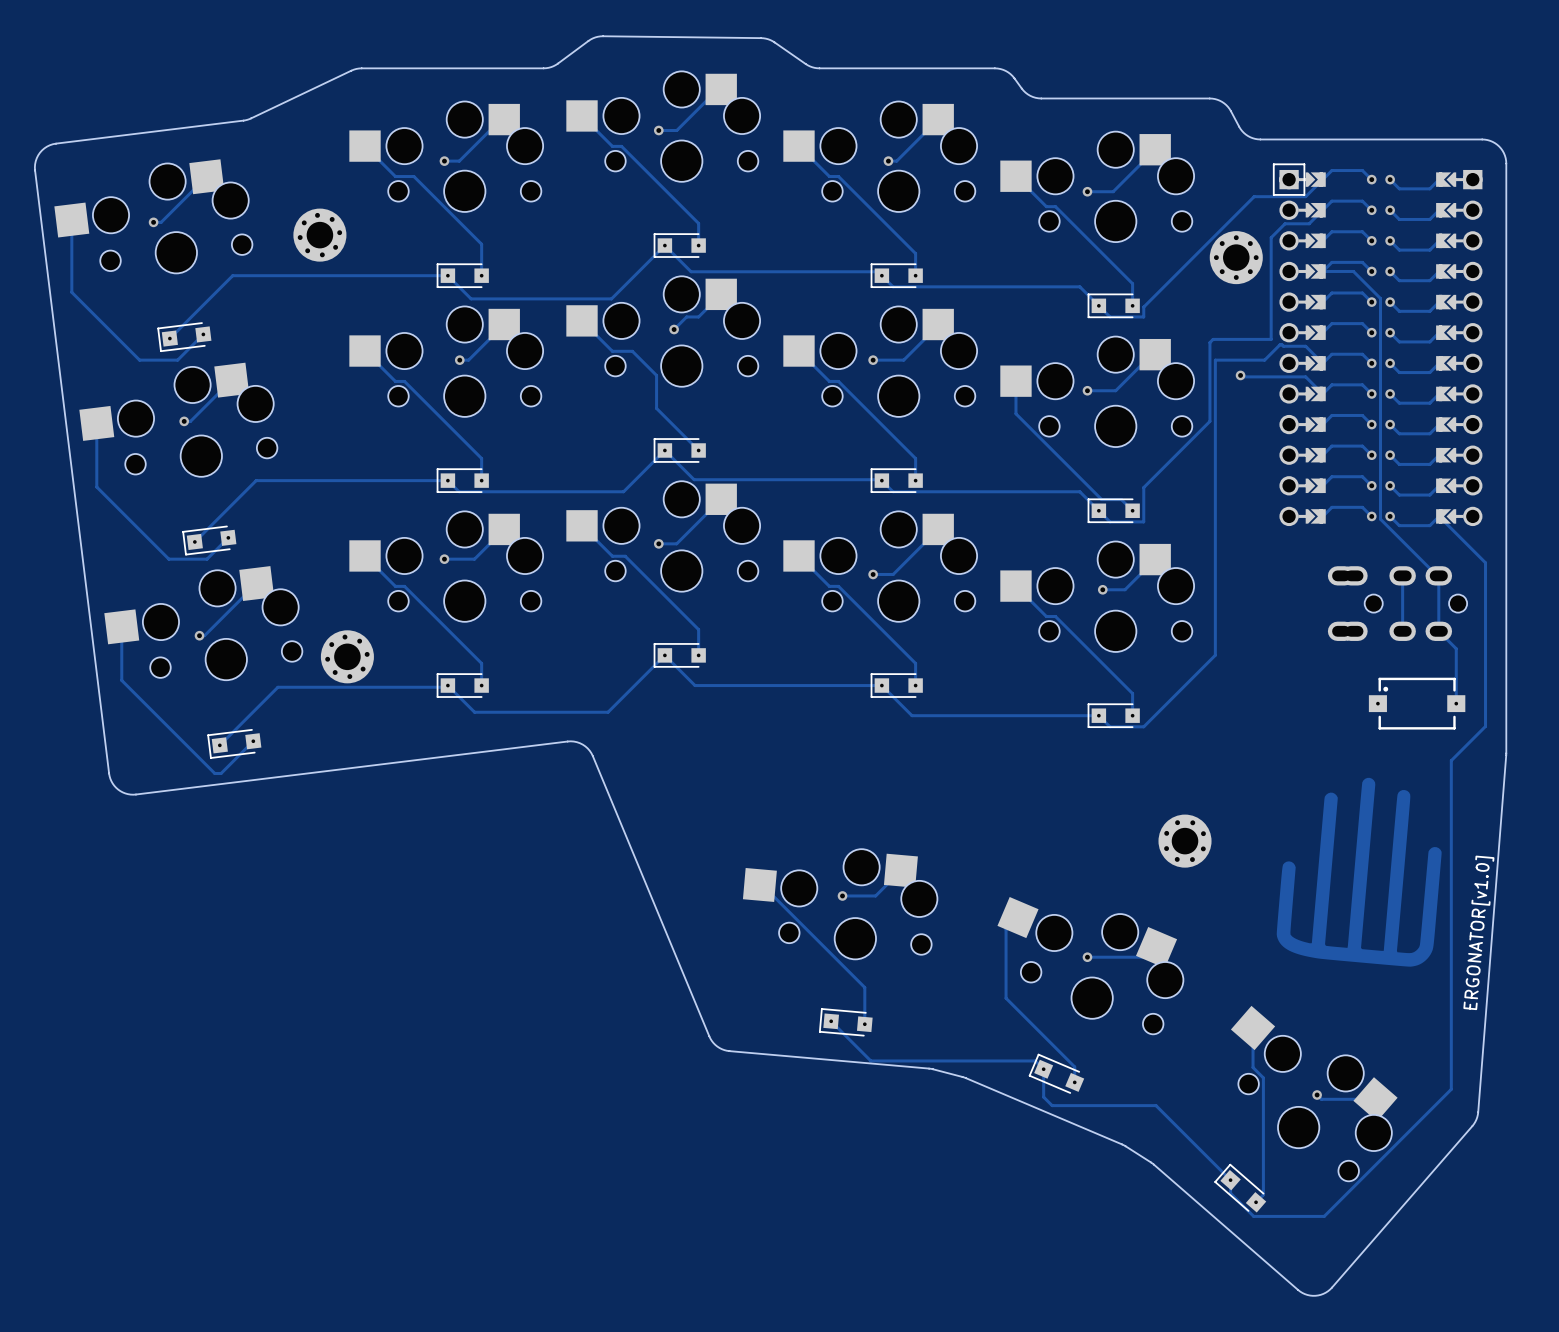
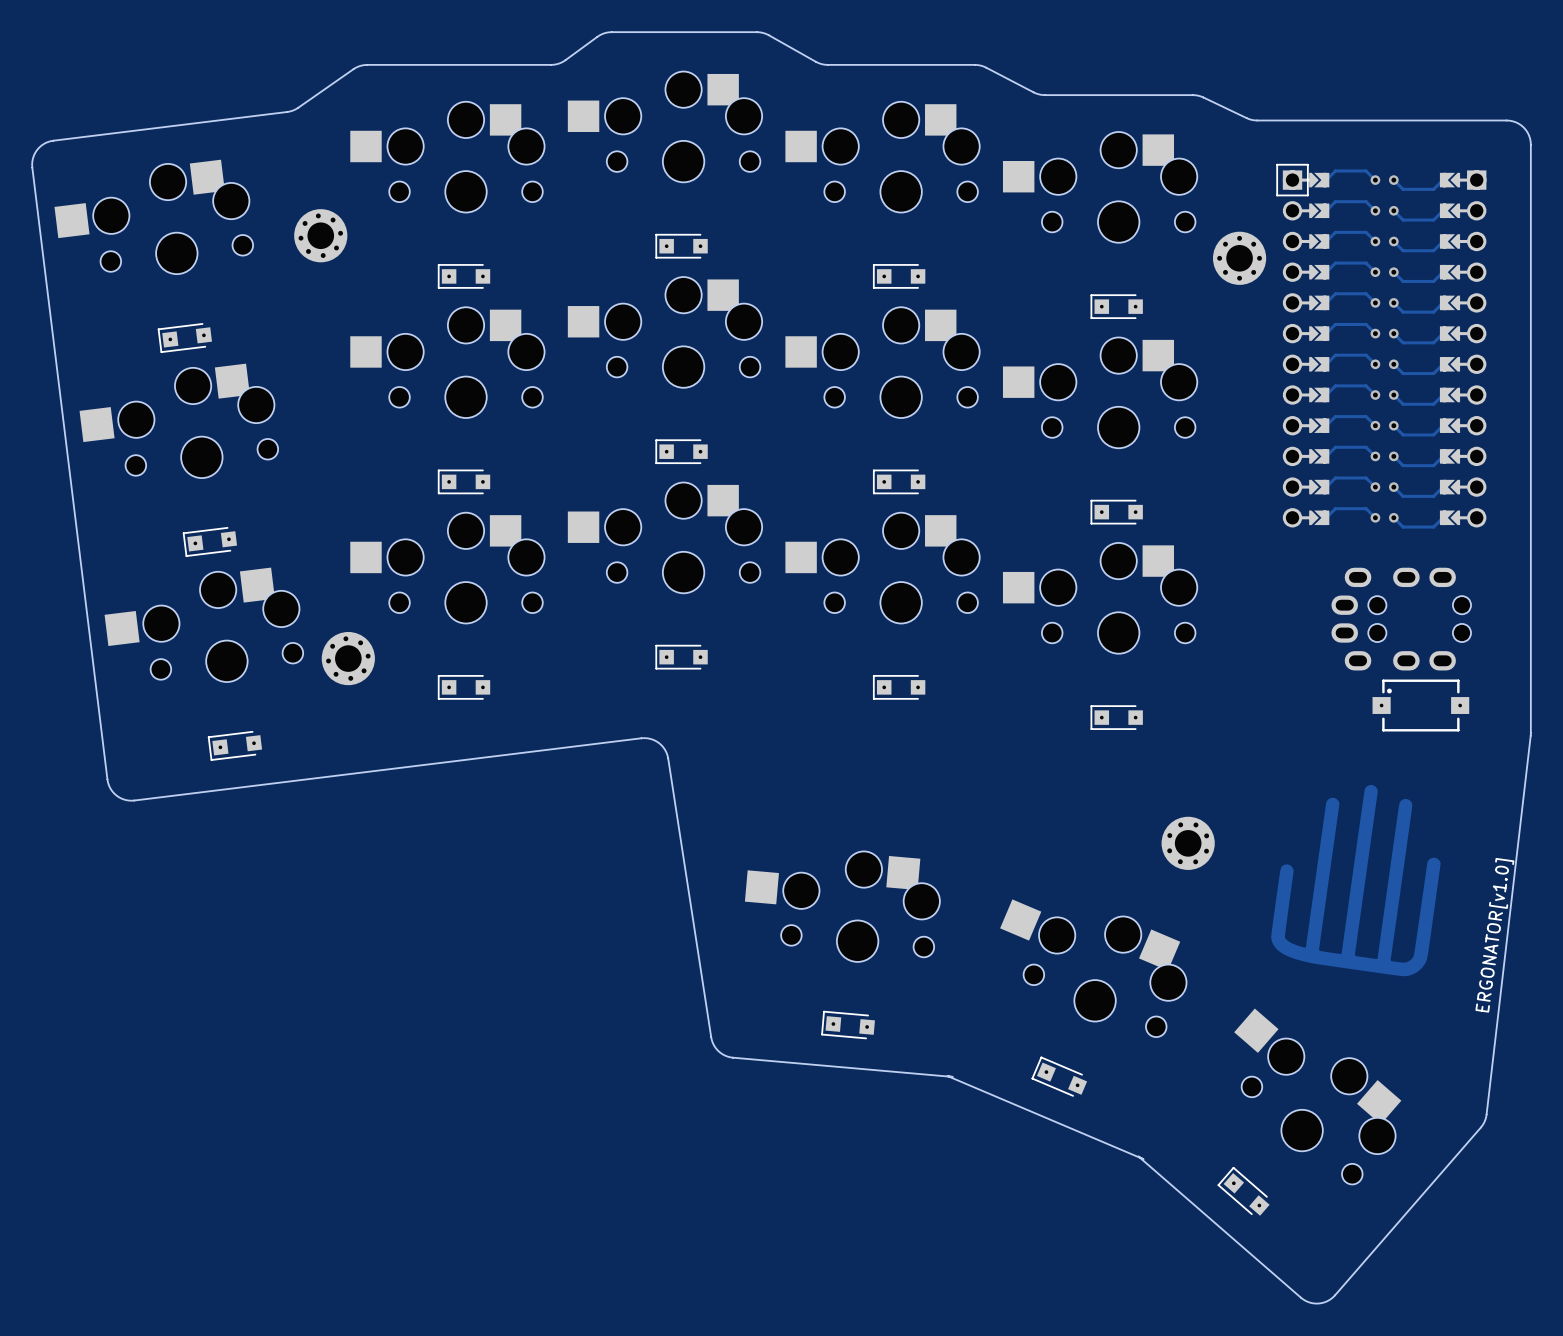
board edge: (603, 36) (763, 38) (772, 41) (807, 65) (817, 68) (997, 68) (1010, 74) (1027, 94) (1038, 98) (1212, 98) (1222, 101) (1228, 106) (1243, 132) (1257, 139) (1482, 139) (1495, 143) (1502, 150) (1506, 163) (1506, 754) (1477, 1114) (1472, 1126) (1325, 1292) (1312, 1295) (1300, 1291) (1153, 1164) (1125, 1146) (965, 1078) (929, 1068) (729, 1051) (717, 1046) (709, 1036) (592, 756) (587, 748) (579, 743) (567, 741) (135, 794) (122, 792) (112, 783) (109, 773) (35, 170) (38, 155) (44, 148) (56, 143) (247, 119) (356, 68) (548, 67) (557, 63) (590, 39) (603, 36) -> (611, 32) (599, 35) (565, 60) (556, 64) (362, 65) (353, 69) (290, 111) (53, 140) (41, 145) (35, 152) (32, 167) (109, 787) (118, 797) (134, 800) (641, 738) (653, 739) (663, 747) (668, 758) (711, 1037) (715, 1047) (720, 1052) (733, 1057) (952, 1076) (947, 1076) (1143, 1159) (1138, 1156) (1300, 1297) (1312, 1303) (1327, 1301) (1335, 1295) (1480, 1127) (1486, 1116) (1530, 734) (1530, 144) (1527, 132) (1518, 123) (1506, 120) (1254, 120) (1195, 95) (1039, 94) (977, 65) (824, 64) (760, 32) (611, 32)
track: (721, 89) (717, 89) (676, 130) (658, 130) -> none
track: (582, 115) (612, 146) (621, 146) (698, 223) (698, 245) -> none
track: (504, 119) (500, 119) (459, 161) (444, 161) -> none
track: (938, 119) (896, 161) (888, 161) -> none
via: (658, 130) -> none
track: (365, 146) (395, 176) (413, 176) (481, 244) (481, 275) -> none
track: (798, 146) (829, 176) (838, 176) (915, 253) (915, 275) -> none
track: (1155, 149) (1113, 191) (1087, 191) -> none
via: (444, 161) -> none
via: (888, 161) -> none
track: (206, 176) (161, 222) (153, 222) -> none
track: (1015, 176) (1046, 206) (1055, 206) (1132, 283) (1132, 305) -> none
track: (1322, 179) (1305, 196) (1254, 196) (1143, 307) (1143, 316) (1110, 316) (1079, 286) (893, 286) (877, 271) (691, 271) (664, 245) (611, 298) (471, 298) (447, 275) (232, 275) (169, 338) -> none
via: (1087, 191) -> none
track: (1322, 210) (1309, 223) (1285, 223) (1271, 237) (1271, 339) (1213, 339) (1209, 342) (1209, 421) (1143, 487) (1143, 521) (1110, 521) (1079, 491) (893, 491) (880, 479) (694, 479) (664, 450) (623, 491) (459, 491) (447, 480) (256, 480) (194, 541) -> none
track: (71, 220) (71, 292) (139, 360) (177, 360) (203, 334) -> none
via: (153, 222) -> none
track: (1322, 271) (1353, 271) (1380, 298) (1380, 519) (1438, 575) (1438, 631) (1456, 648) (1456, 703) -> none
track: (721, 294) (698, 316) (686, 316) (674, 329) -> none
track: (582, 320) (612, 351) (632, 351) (656, 375) (656, 408) (698, 450) -> none
track: (504, 324) (468, 360) (459, 360) -> none
track: (938, 324) (903, 360) (873, 360) -> none
via: (674, 329) -> none
track: (365, 351) (395, 381) (404, 381) (481, 458) (481, 480) -> none
track: (798, 351) (829, 381) (838, 381) (915, 458) (915, 480) -> none
track: (1155, 354) (1151, 354) (1115, 390) (1087, 390) -> none
via: (459, 360) -> none
via: (873, 360) -> none
track: (1322, 363) (1305, 346) (1282, 344) (1264, 360) (1215, 360) (1215, 655) (1143, 726) (1110, 726) (1098, 715) (912, 715) (881, 685) (695, 685) (664, 655) (608, 712) (474, 712) (447, 685) (446, 687) (277, 687) (219, 745) -> none
track: (1240, 375) (1305, 376) (1322, 393) -> none
via: (1240, 375) -> none
track: (231, 380) (190, 421) (184, 421) -> none
track: (1015, 381) (1015, 413) (1101, 499) (1121, 499) (1132, 510) -> none
via: (1087, 390) -> none
via: (184, 421) -> none
track: (96, 423) (96, 487) (168, 559) (207, 559) (228, 537) -> none
track: (721, 499) (676, 543) (658, 543) -> none
track: (1439, 516) (1485, 562) (1485, 726) (1451, 760) (1451, 1089) (1324, 1216) (1253, 1216) (1230, 1193) (1230, 1180) (1156, 1105) (1052, 1105) (1043, 1097) (1043, 1069) (1035, 1060) (870, 1060) (831, 1021) -> none
track: (582, 525) (612, 556) (625, 556) (698, 629) (698, 655) -> none
track: (504, 529) (474, 559) (444, 559) -> none
track: (938, 529) (893, 574) (873, 574) -> none
via: (658, 543) -> none
track: (365, 555) (395, 586) (404, 586) (481, 663) (481, 685) -> none
track: (798, 555) (829, 586) (838, 586) (915, 663) (915, 685) -> none
via: (444, 559) -> none
track: (1155, 559) (1125, 589) (1102, 589) -> none
via: (873, 574) -> none
track: (1402, 575) (1402, 631) -> none
track: (256, 583) (204, 635) (199, 635) -> none
track: (1015, 586) (1046, 616) (1055, 616) (1132, 693) (1132, 715) -> none
via: (1102, 589) -> none
part: (1397, 603) -> none
part: none -> (1401, 619)
track: (121, 626) (121, 680) (214, 773) (221, 773) (253, 741) -> none
via: (199, 635) -> none
drawing shape: [1276, 777, 1442, 967] -> [1271, 784, 1441, 977]
track: (900, 870) (875, 895) (842, 895) -> none
track: (759, 884) (762, 884) (864, 987) (864, 1024) -> none
via: (842, 895) -> none
track: (1018, 917) (1006, 929) (1006, 998) (1074, 1066) (1074, 1082) -> none
text rotation: 0° (1478, 932) -> 3° clockwise (1494, 935)
track: (1156, 947) (1146, 957) (1087, 957) -> none
via: (1087, 957) -> none
track: (1253, 1027) (1253, 1067) (1263, 1077) (1263, 1194) (1256, 1202) -> none
track: (1317, 1094) (1321, 1099) (1375, 1099) -> none
via: (1317, 1094) -> none

